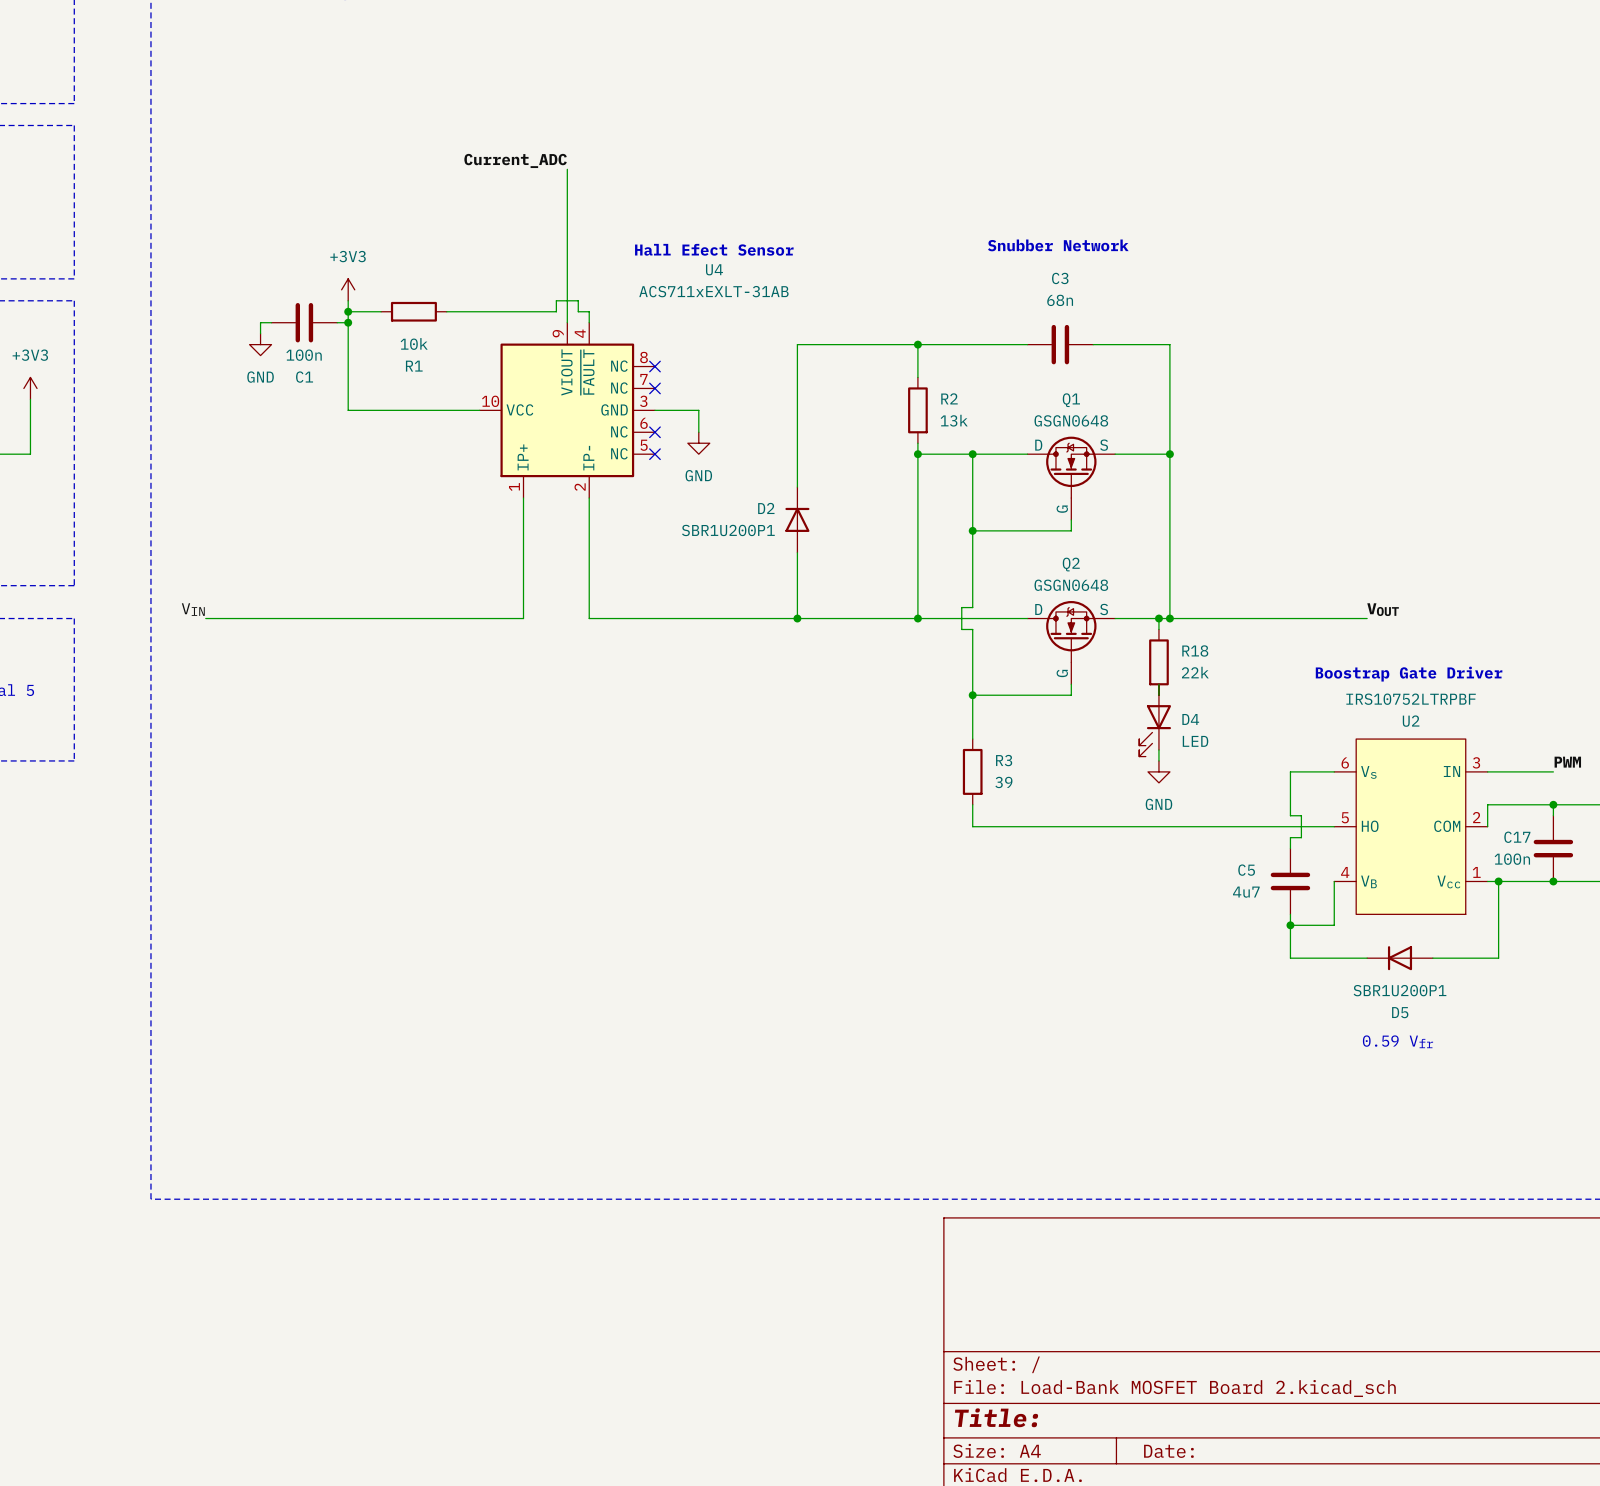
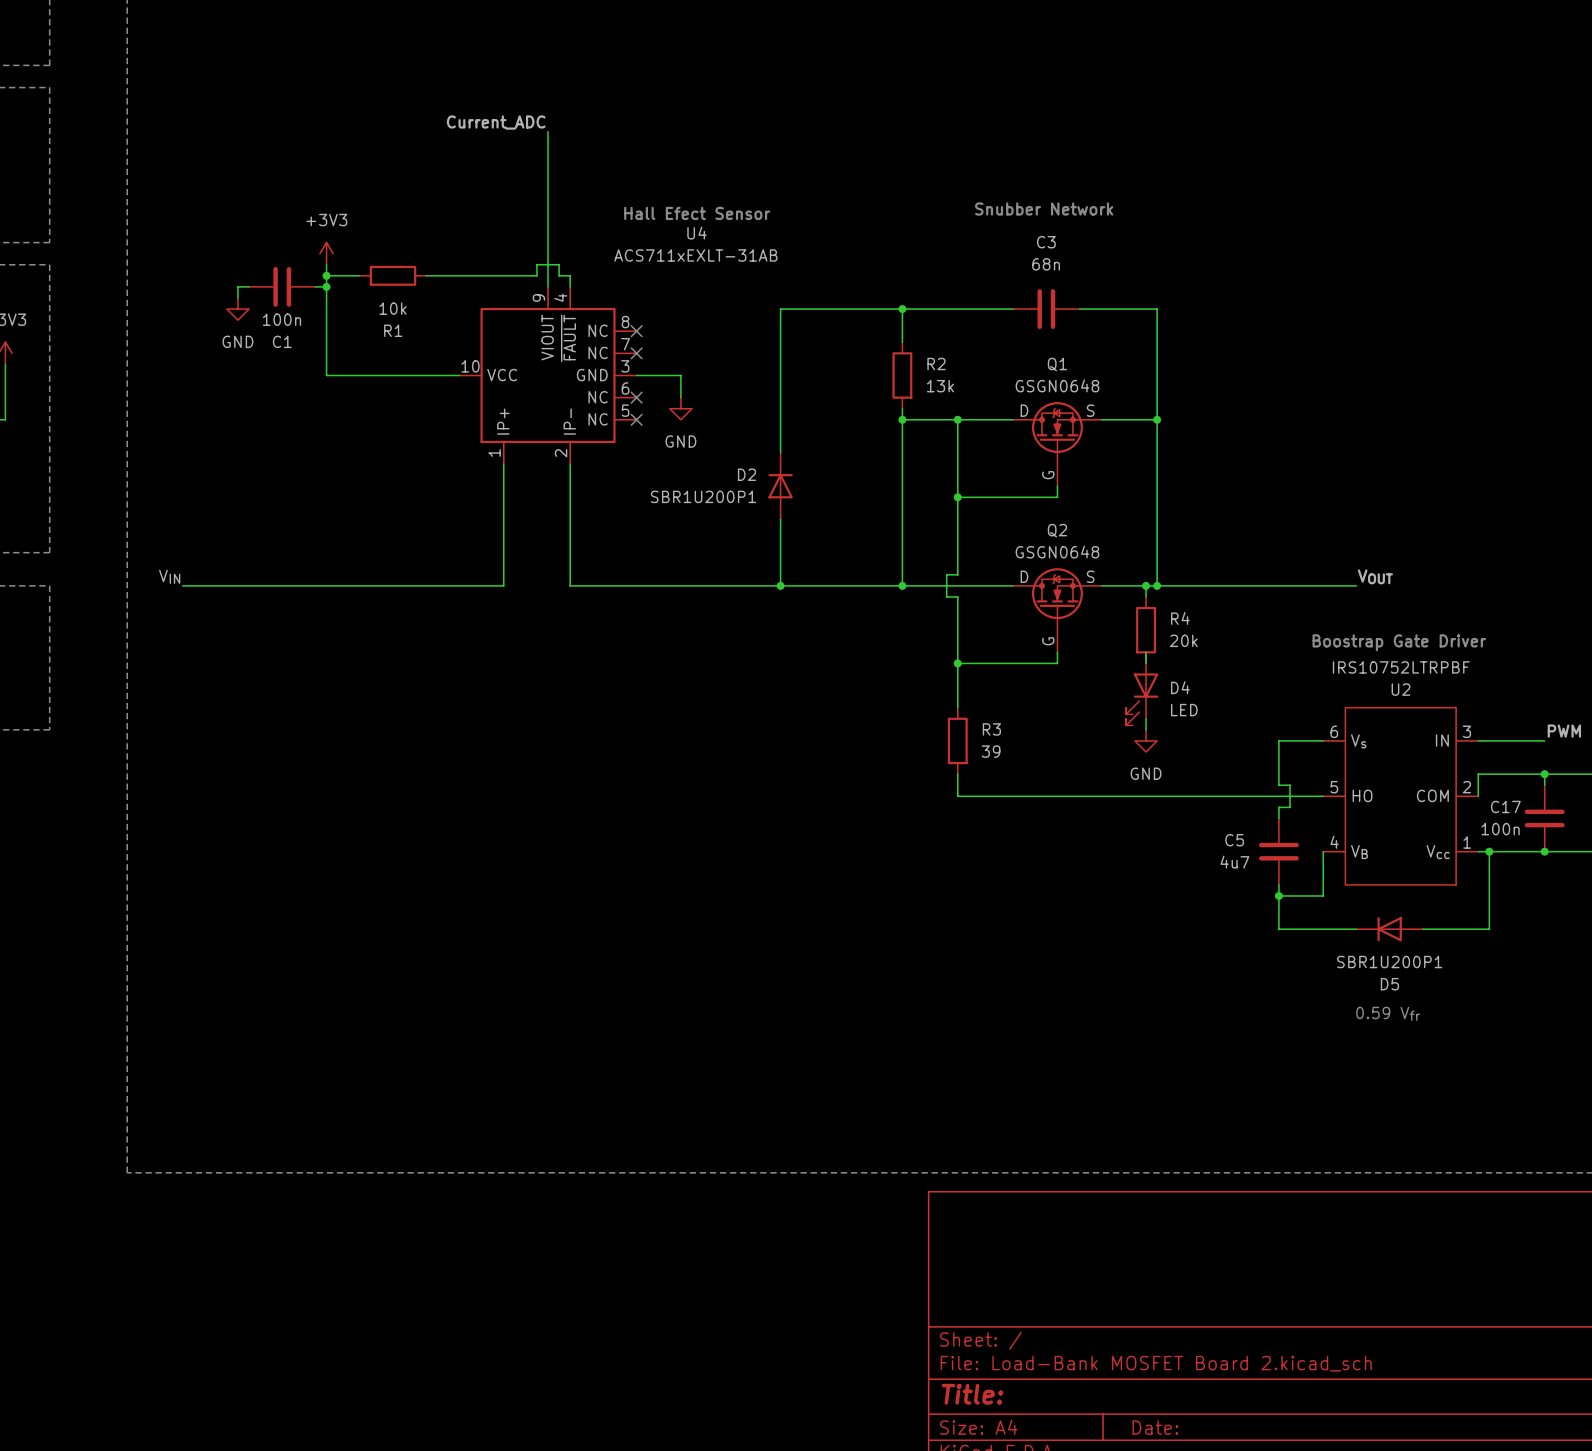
R18 name: R18 (1195, 650) -> R4 (1180, 618)
R18 value: 22k (1195, 672) -> 20k (1183, 640)

